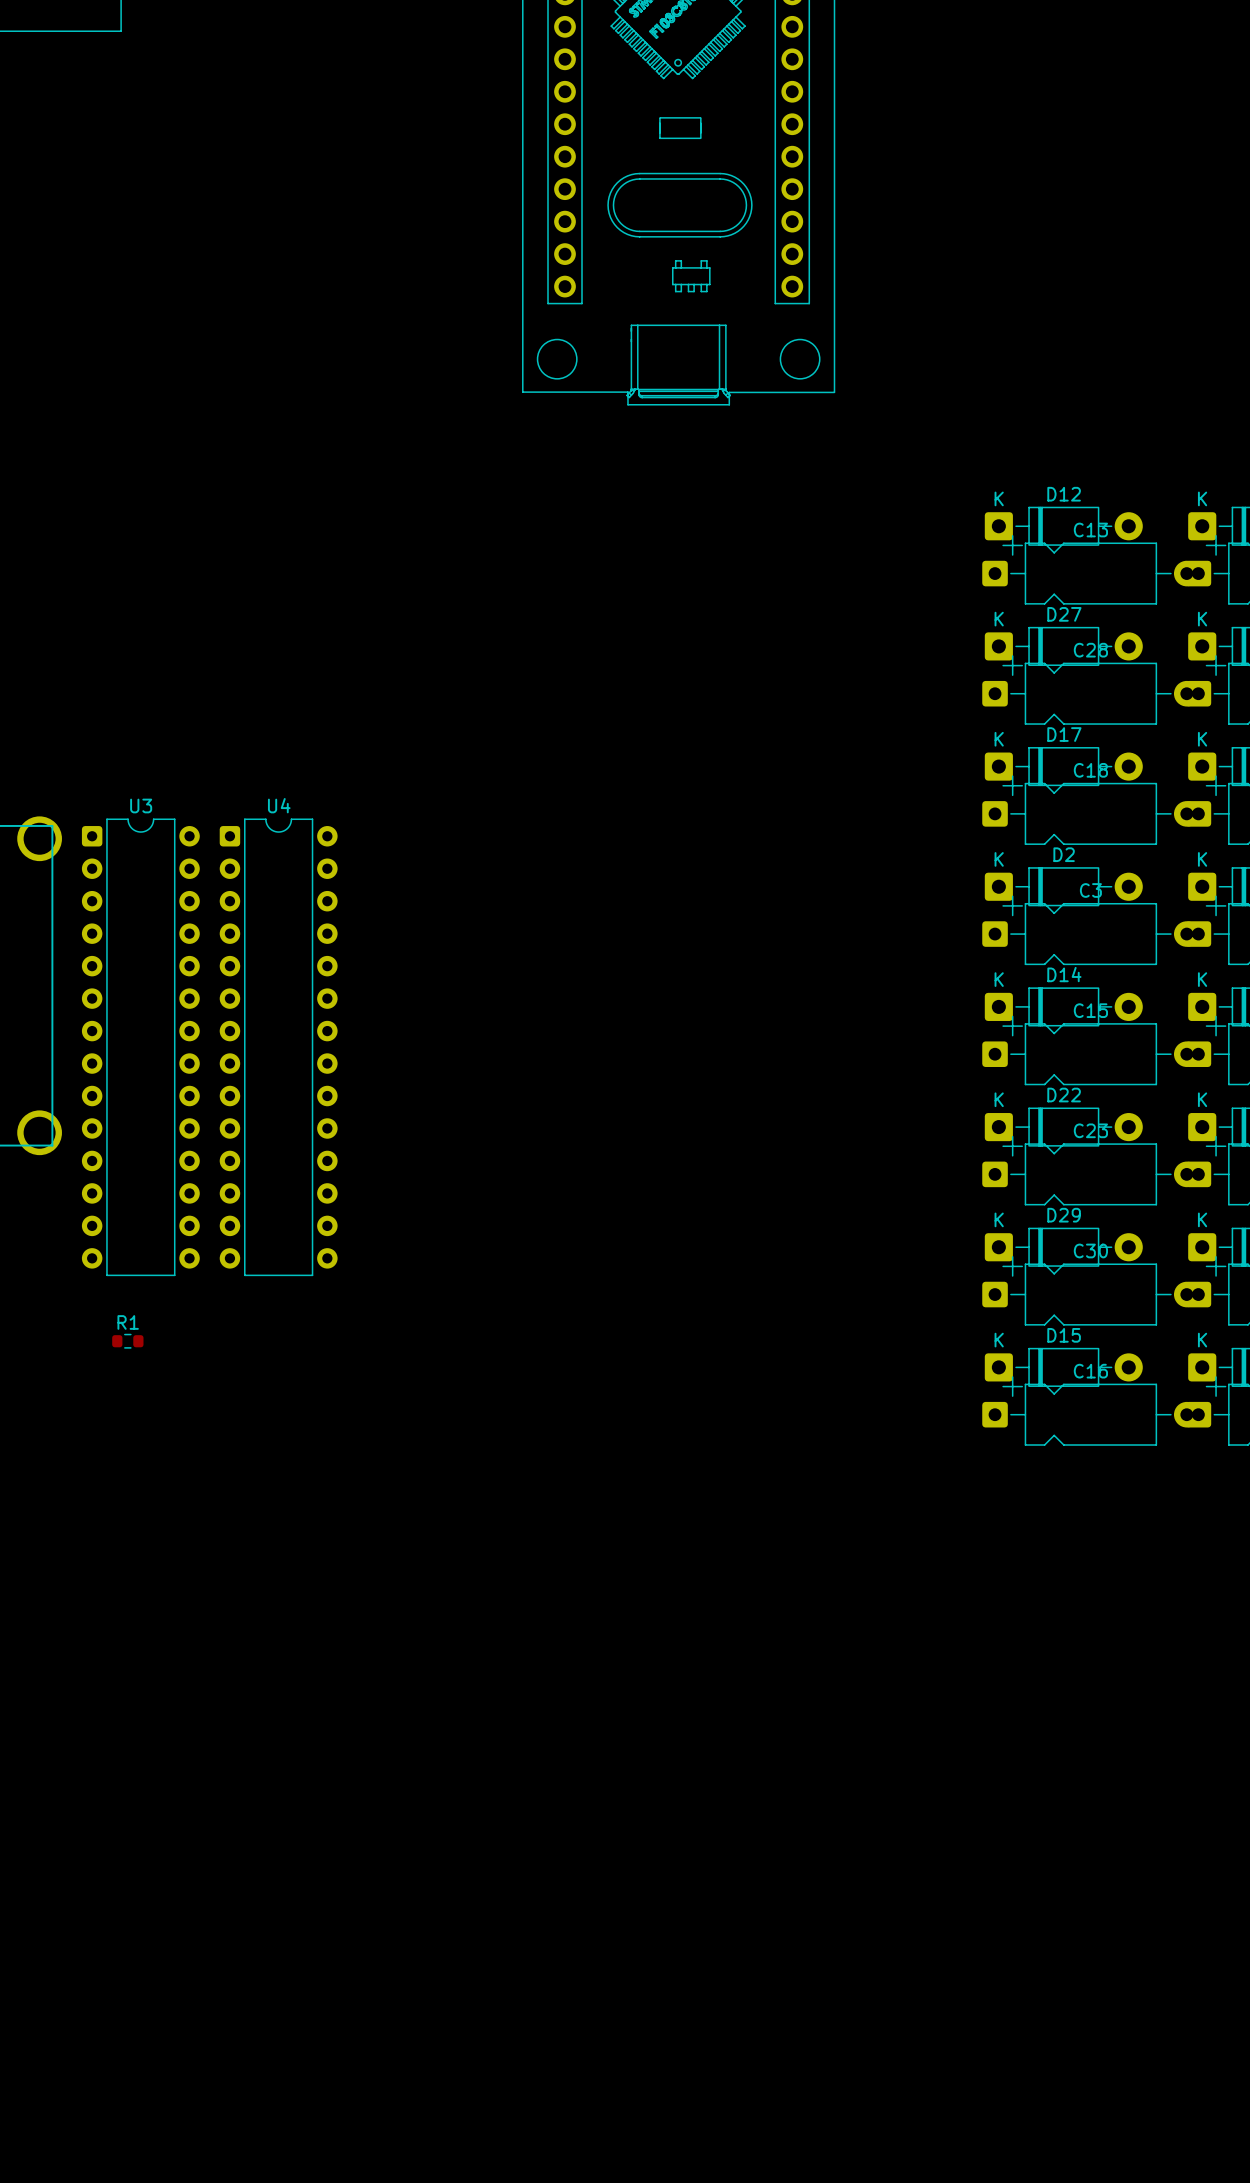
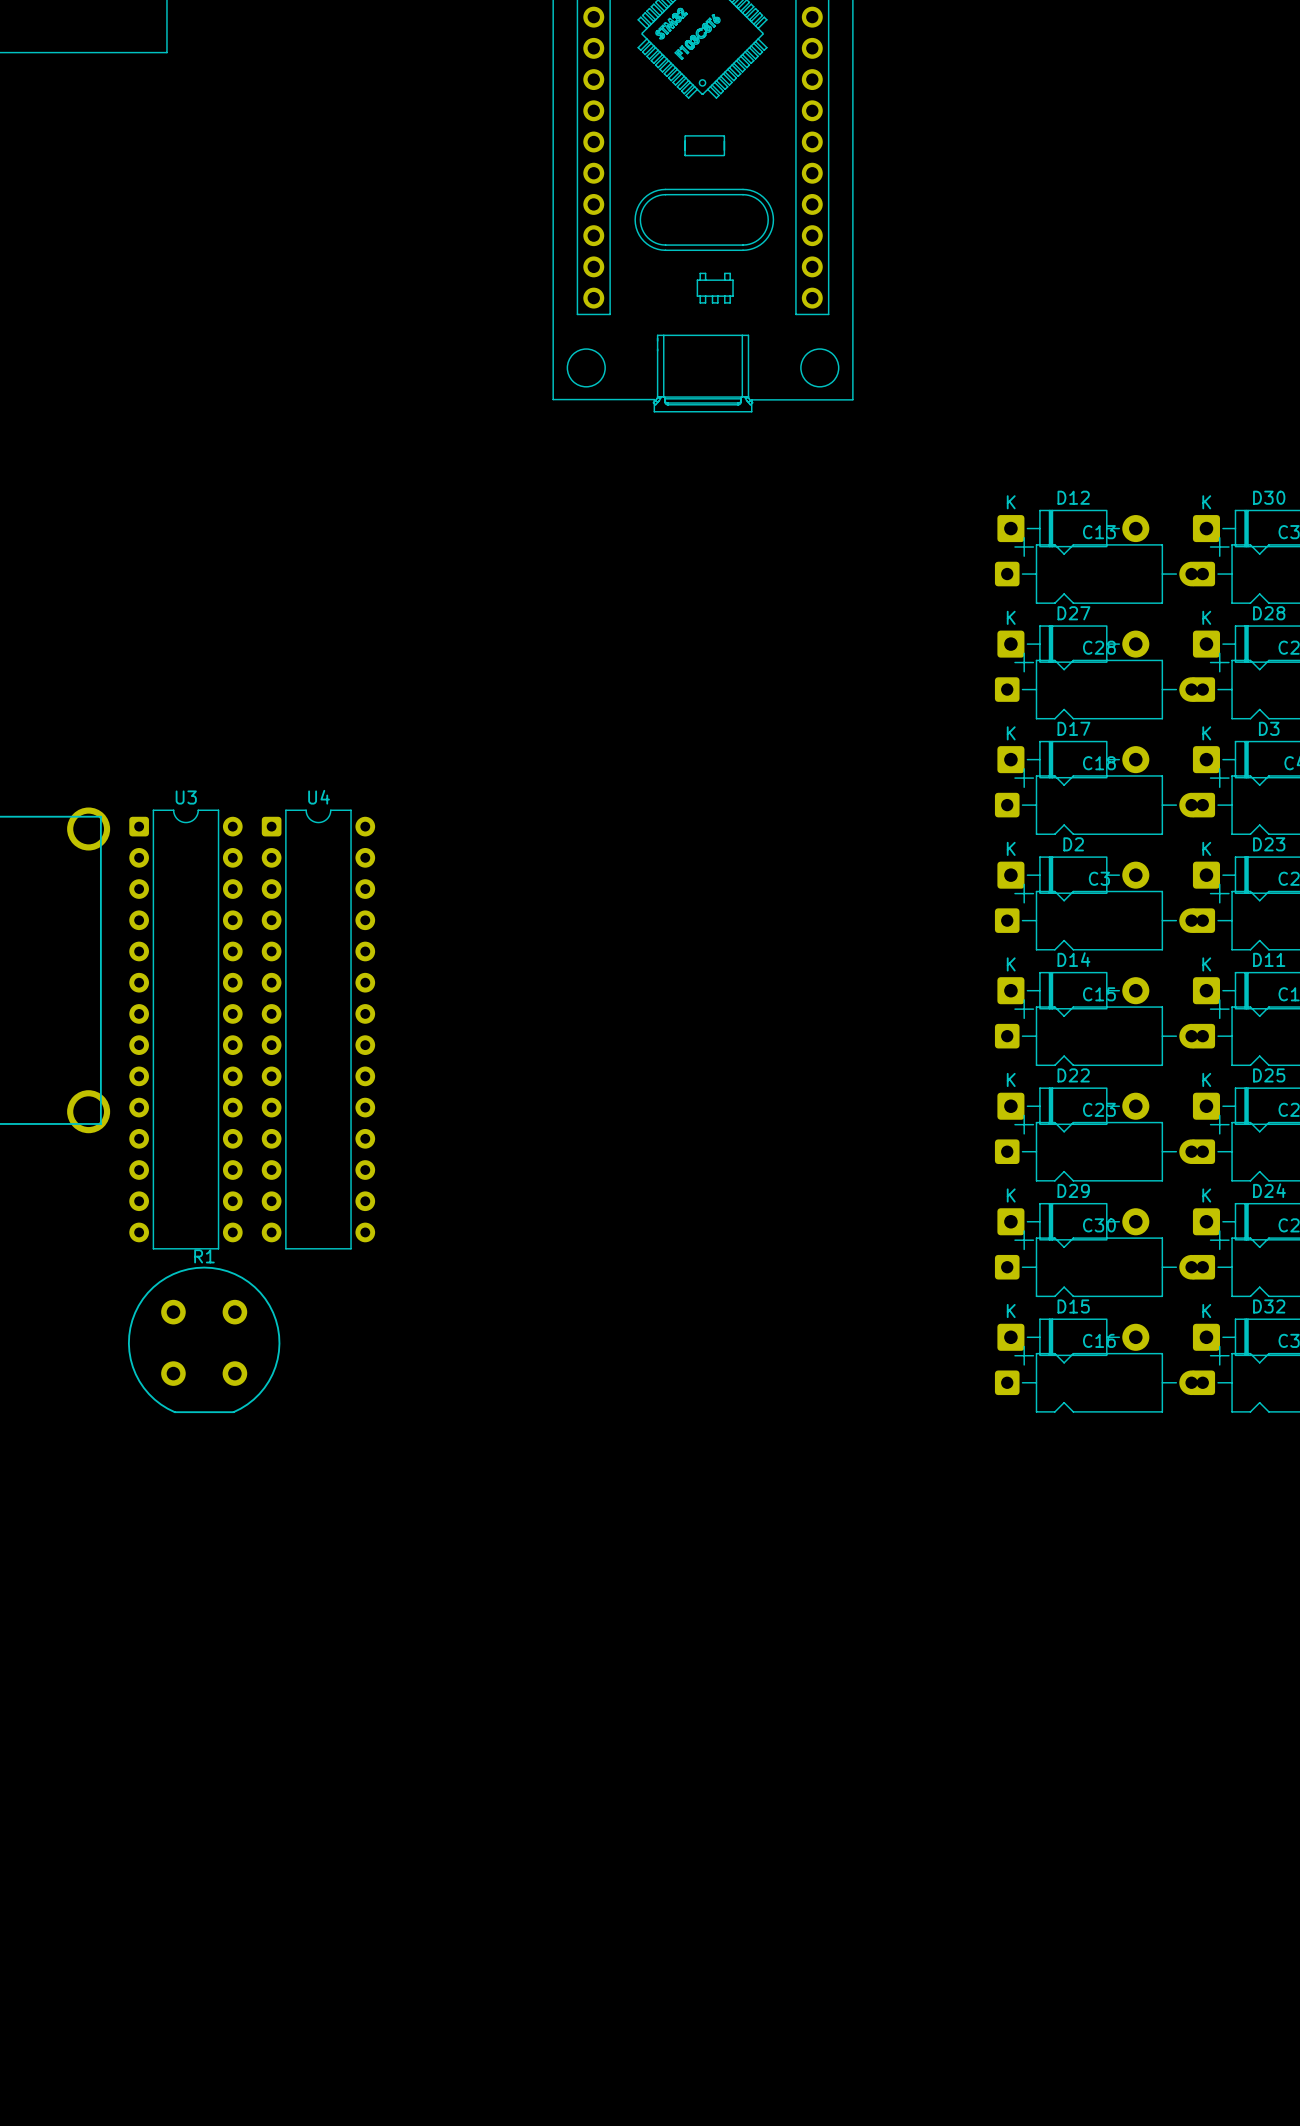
R1 name position: R1 (128, 1322) -> R1 (204, 1256)
R1 footprint: [112, 1333, 144, 1349] -> [127, 1266, 281, 1414]

